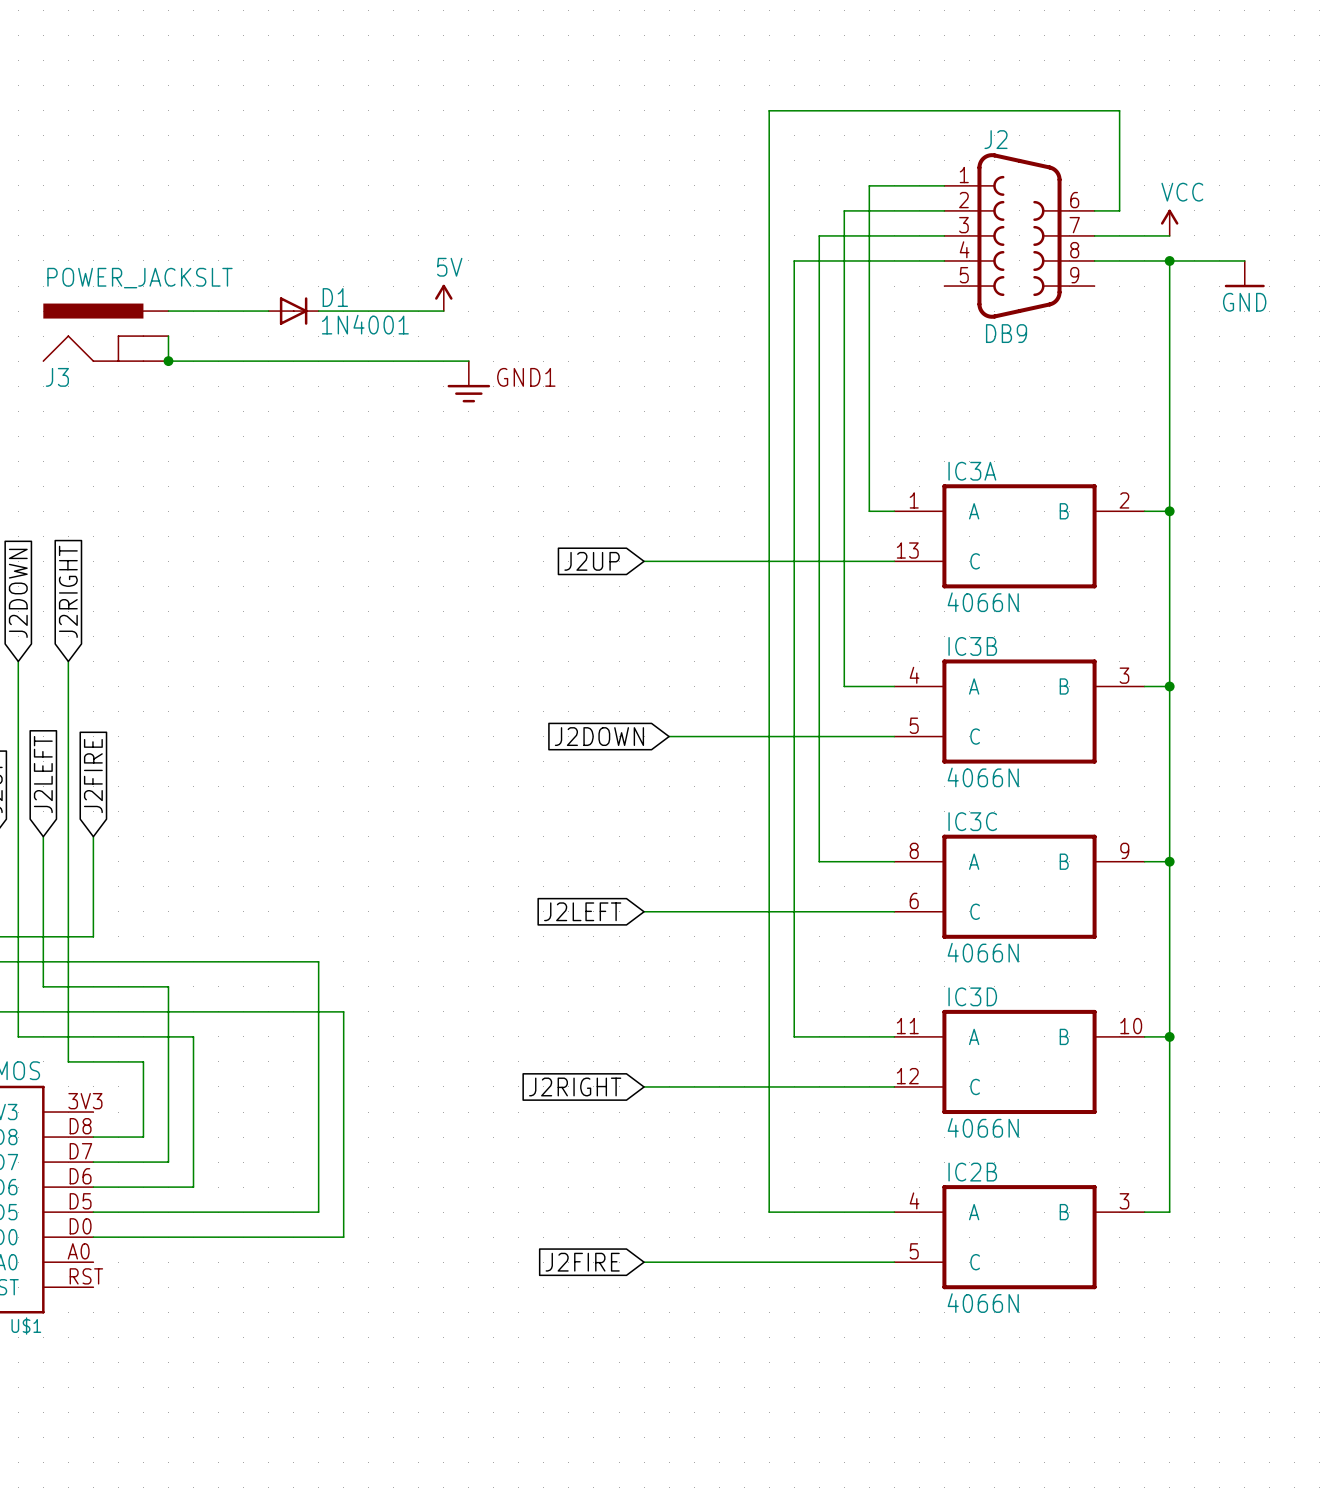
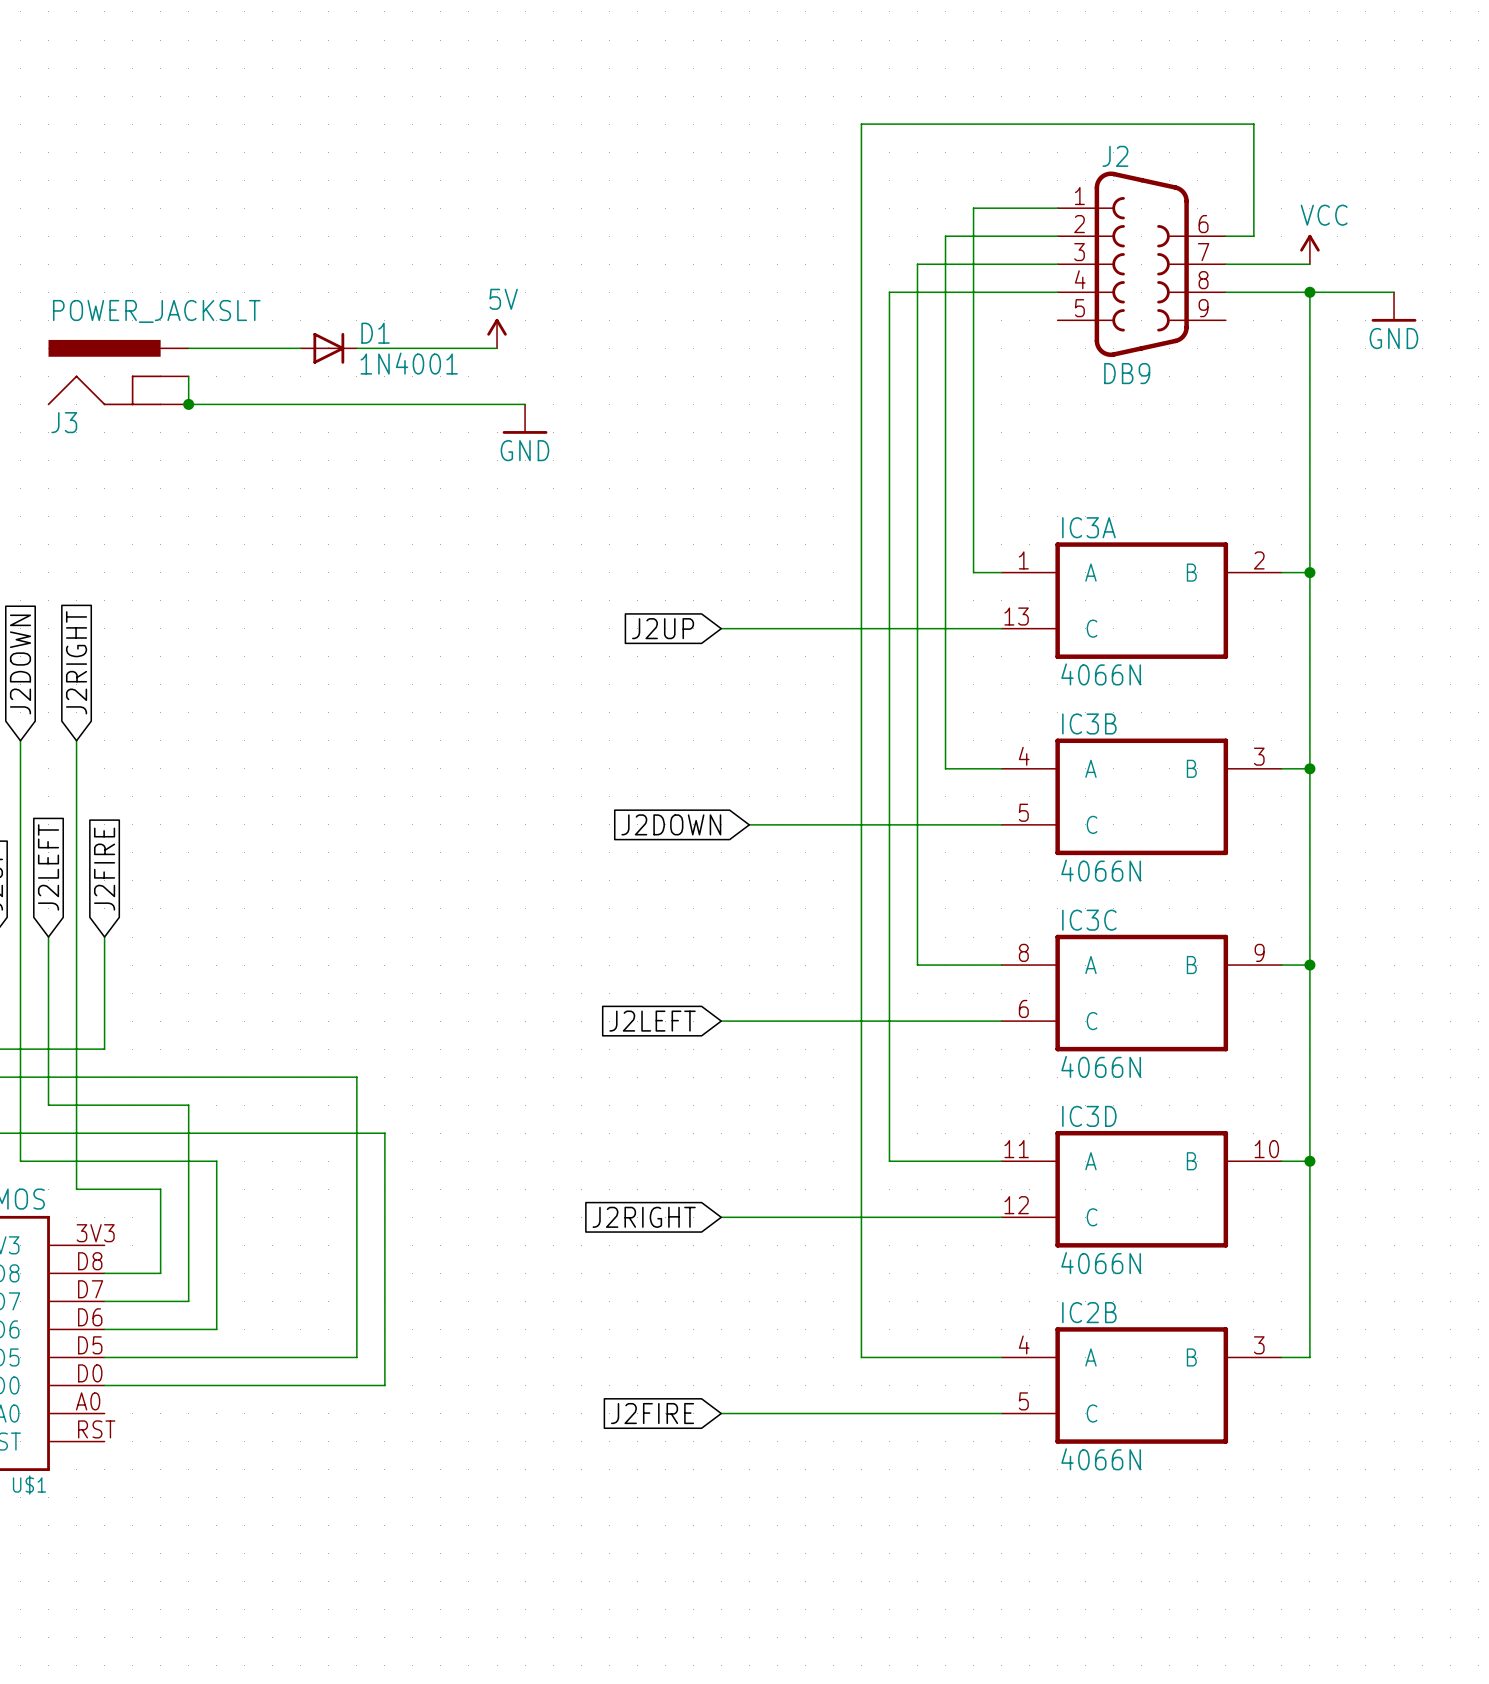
GND1 shape: [447, 361, 491, 403] -> [502, 404, 548, 434]
GND1 name: GND1 (526, 377) -> none
GND1 text: none -> GND (524, 450)

